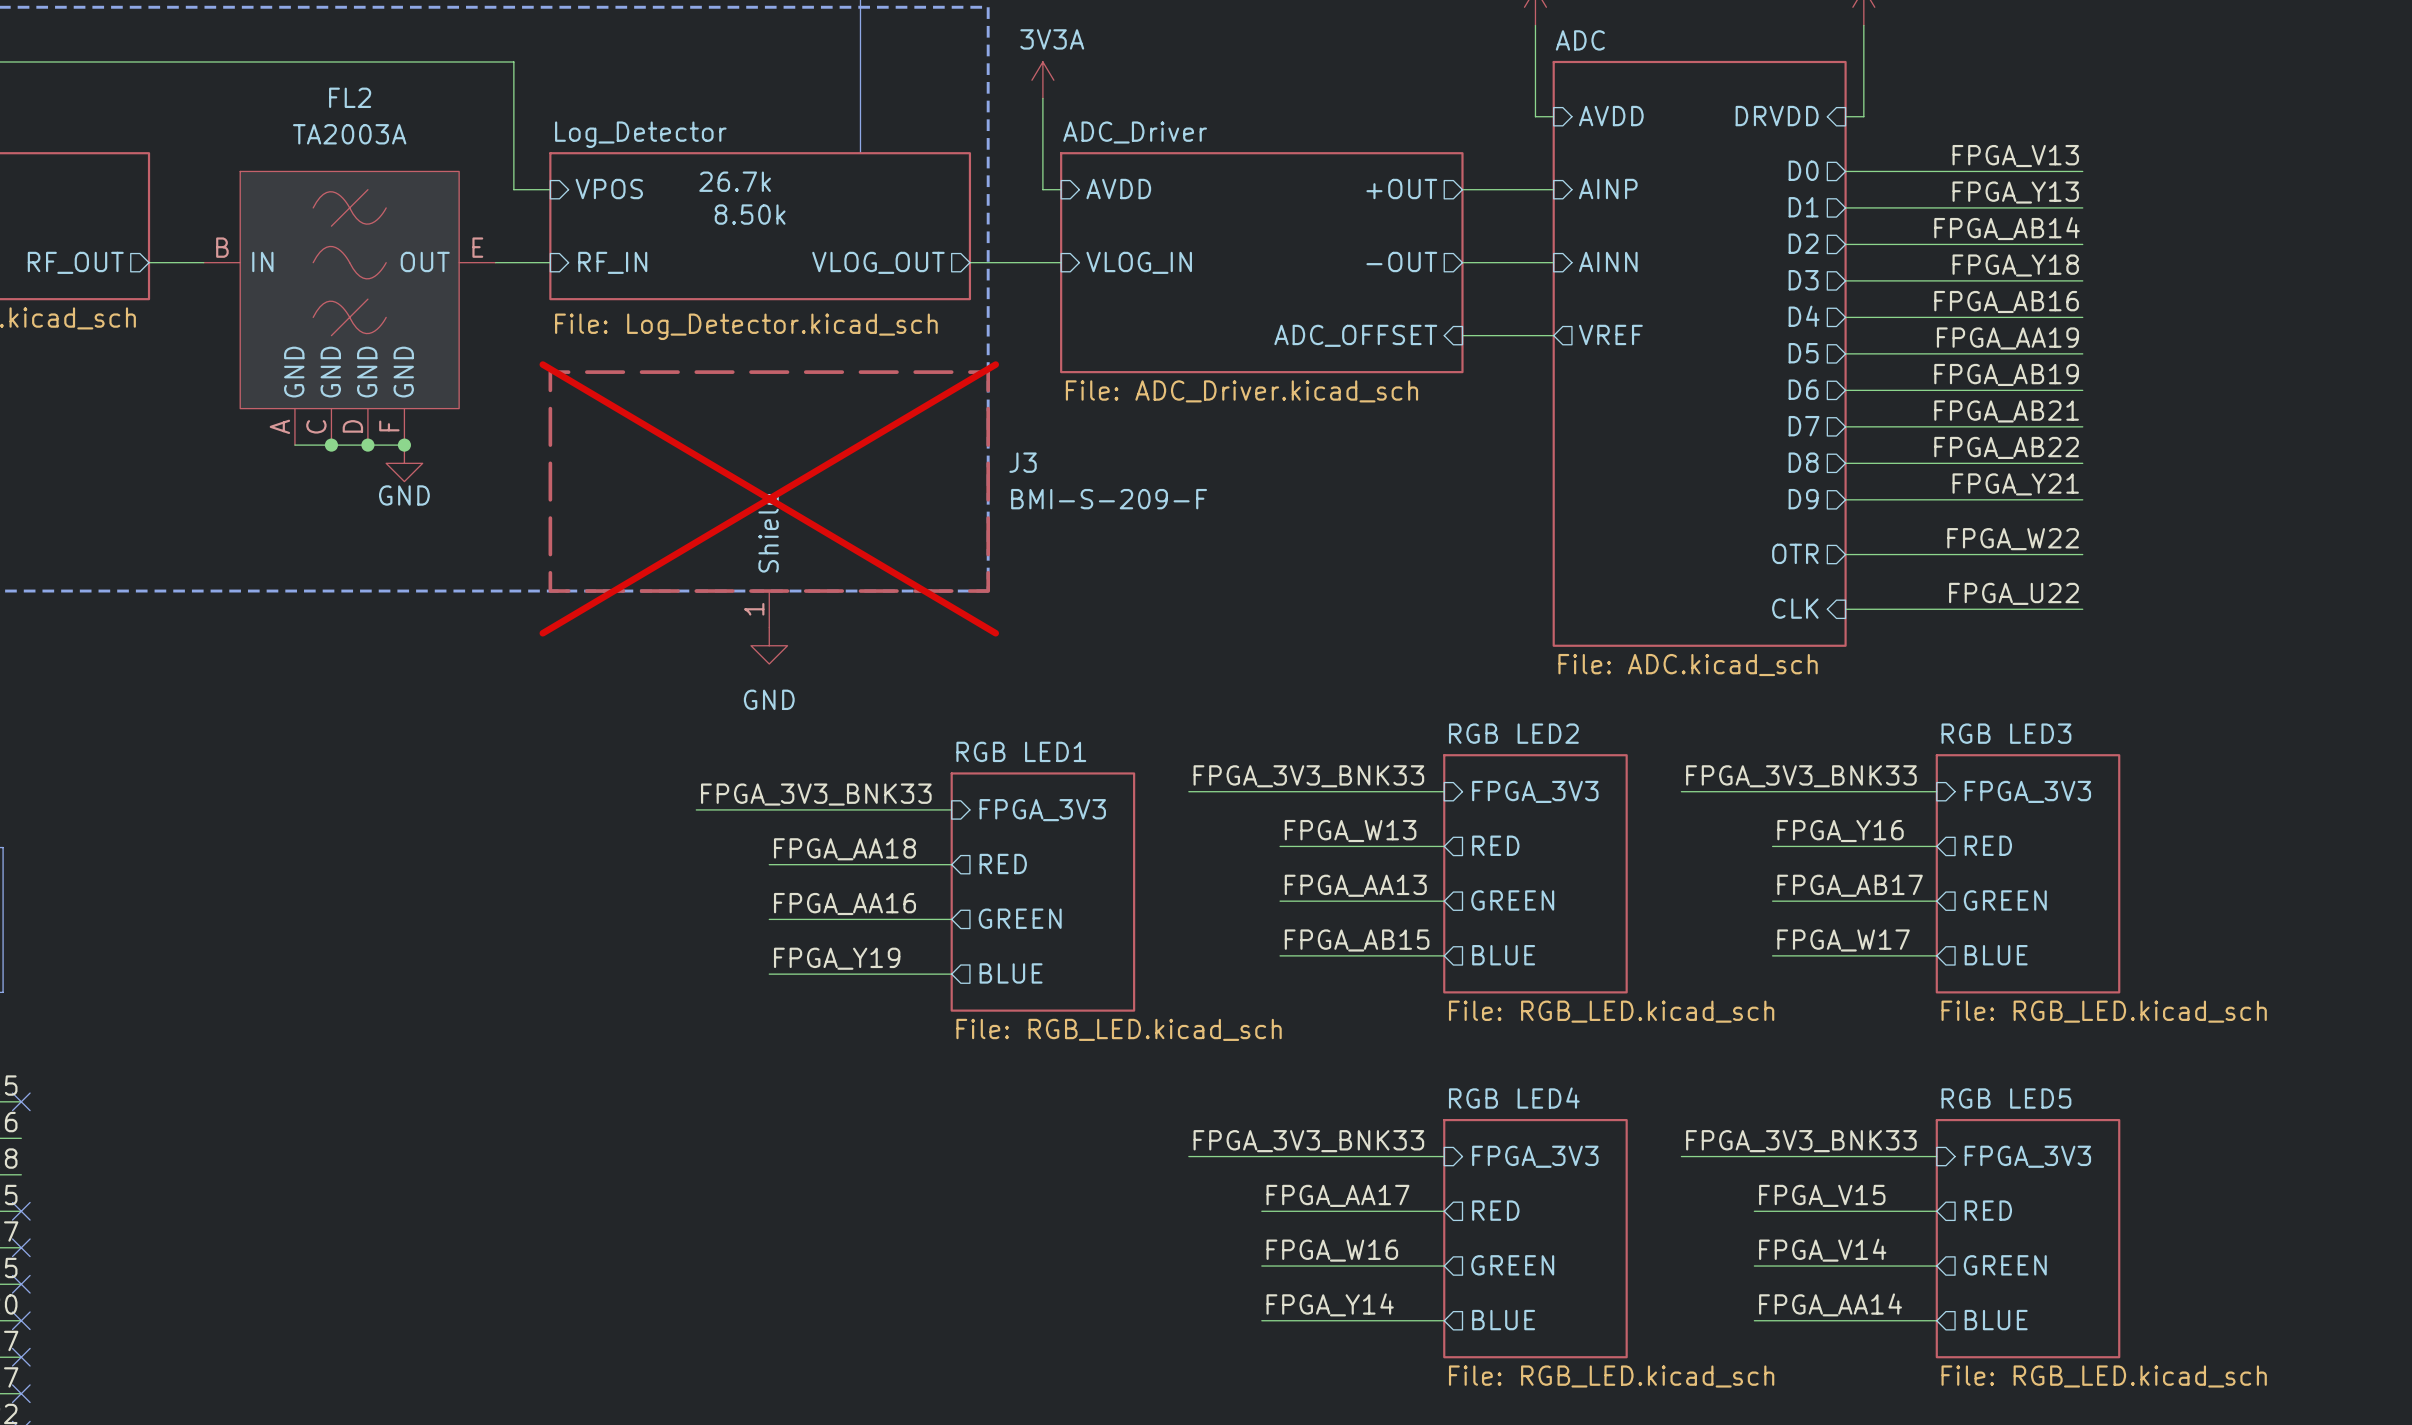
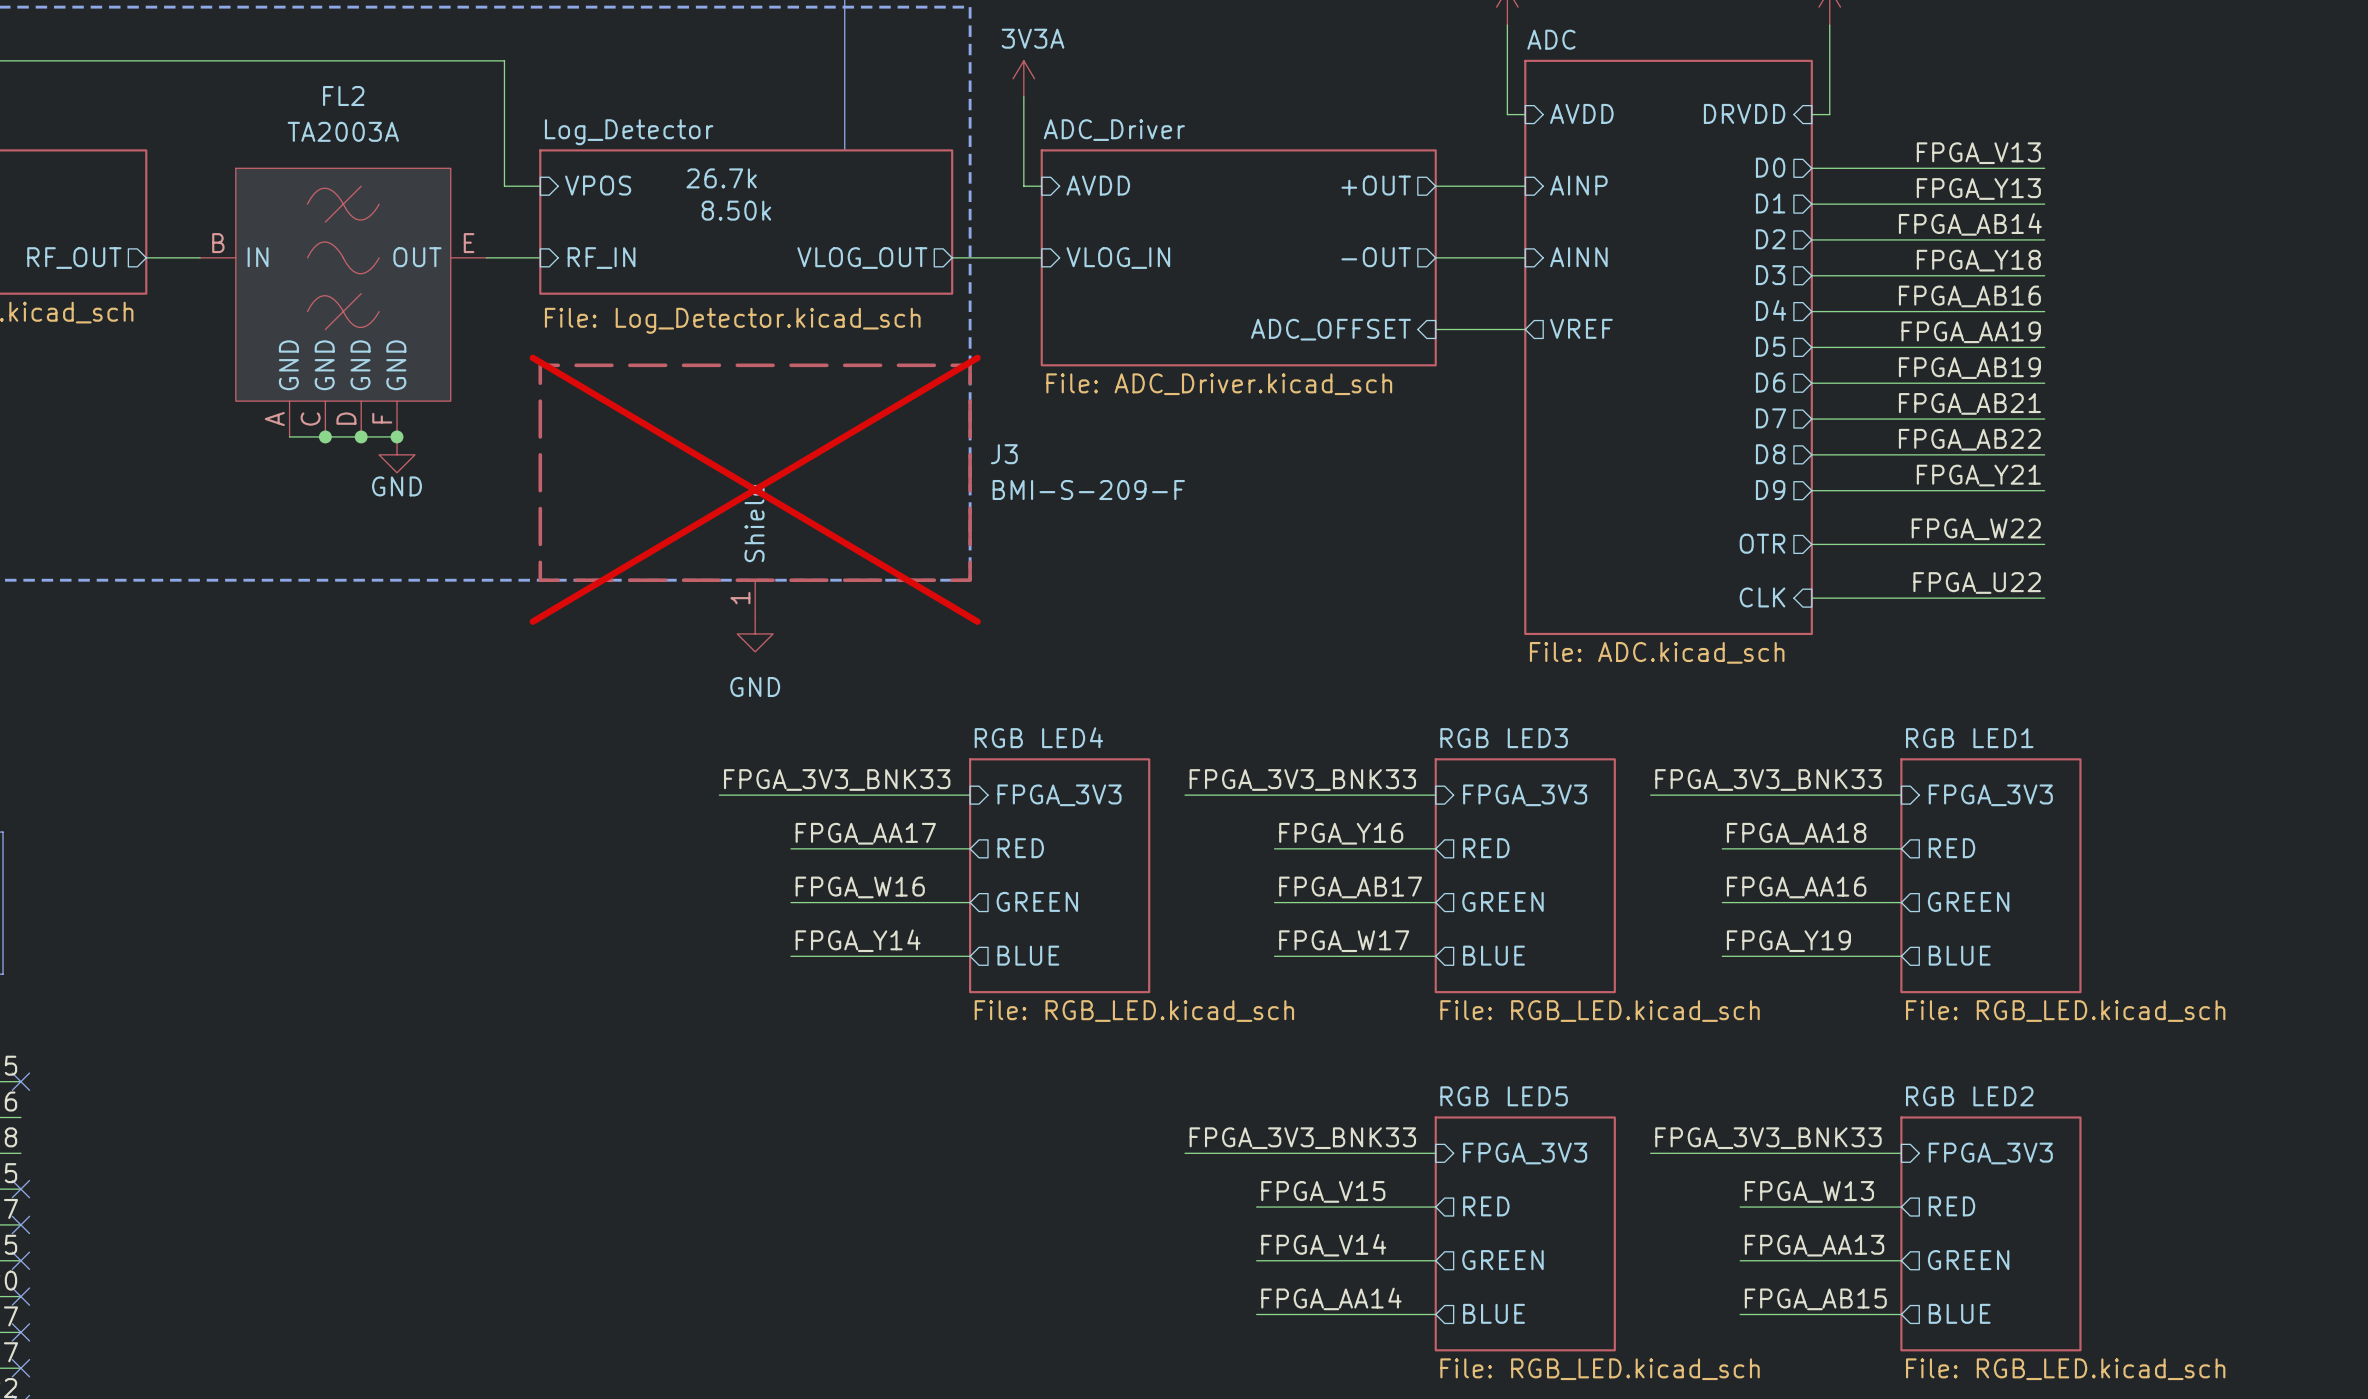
label position: FPGA_3V3_BNK33 (1308, 776) -> FPGA_3V3_BNK33 (1302, 780)
label position: FPGA_3V3_BNK33 (1801, 776) -> FPGA_3V3_BNK33 (1768, 780)
wire: (1188, 791) (1444, 791) -> (1185, 795) (1435, 795)
sheet pin position: FPGA_3V3 (1535, 791) -> FPGA_3V3 (1525, 795)
wire: (1681, 791) (1936, 791) -> none
sheet pin position: FPGA_3V3 (2027, 791) -> FPGA_3V3 (1990, 795)
label position: FPGA_3V3_BNK33 (816, 794) -> FPGA_3V3_BNK33 (837, 780)
wire: (696, 809) (732, 809) -> (934, 795) (970, 795)
sheet pin position: FPGA_3V3 (1042, 810) -> FPGA_3V3 (1059, 795)
label: FPGA_W13 (1350, 831) -> none
label: FPGA_Y16 (1840, 831) -> none
sheet pin position: RED (1495, 845) -> RED (1486, 848)
sheet pin position: RED (1988, 845) -> RED (1951, 848)
wire: (1280, 846) (1444, 846) -> (1274, 848) (1435, 848)
wire: (1772, 846) (1936, 846) -> none
label: FPGA_AA18 (844, 849) -> FPGA_AA17 (865, 833)
label: none -> FPGA_Y16 (1341, 833)
label: none -> FPGA_AA18 (1796, 833)
sheet pin position: RED (1003, 863) -> RED (1020, 848)
wire: (769, 864) (805, 864) -> (934, 848) (970, 848)
sheet RGB LED2 position: (1535, 873) -> (1990, 1233)
sheet RGB LED3 position: (2028, 873) -> (1525, 875)
label: FPGA_AA13 (1355, 885) -> none
label: FPGA_AB17 (1850, 885) -> none
sheet RGB LED1 position: (1042, 892) -> (1990, 875)
sheet pin position: GREEN (1512, 900) -> GREEN (1502, 901)
sheet pin position: GREEN (2005, 900) -> GREEN (1968, 901)
wire: (1280, 901) (1444, 901) -> (1274, 902) (1435, 902)
wire: (1772, 901) (1936, 901) -> (1740, 1207) (1901, 1207)
label: FPGA_AA16 (844, 903) -> FPGA_W16 (860, 887)
label: none -> FPGA_AB17 (1350, 887)
label: none -> FPGA_AA16 (1796, 887)
sheet pin position: GREEN (1020, 918) -> GREEN (1037, 901)
wire: (769, 919) (805, 919) -> (934, 902) (970, 902)
label: FPGA_AB15 (1357, 940) -> none
label: FPGA_W17 (1843, 940) -> none
wire: (1280, 955) (1444, 955) -> (1274, 956) (1435, 956)
sheet pin position: BLUE (1503, 955) -> BLUE (1494, 955)
wire: (1772, 955) (1936, 955) -> (1740, 1260) (1901, 1260)
sheet pin position: BLUE (1996, 955) -> BLUE (1959, 955)
label: FPGA_Y19 (837, 958) -> FPGA_Y14 (858, 940)
label: none -> FPGA_W17 (1344, 941)
label: none -> FPGA_Y19 (1788, 941)
sheet pin position: BLUE (1011, 973) -> BLUE (1028, 955)
wire: (769, 974) (805, 974) -> (934, 956) (970, 956)
label position: FPGA_3V3_BNK33 (1308, 1141) -> FPGA_3V3_BNK33 (1302, 1138)
label position: FPGA_3V3_BNK33 (1801, 1141) -> FPGA_3V3_BNK33 (1768, 1138)
wire: (1188, 1156) (1444, 1156) -> (1185, 1153) (1435, 1153)
sheet pin position: FPGA_3V3 (1535, 1156) -> FPGA_3V3 (1525, 1153)
wire: (1681, 1156) (1936, 1156) -> (1650, 795) (1901, 795)
sheet pin position: FPGA_3V3 (2027, 1156) -> FPGA_3V3 (1990, 1153)
wire: none -> (1650, 1153) (1901, 1153)
label: FPGA_AA17 (1337, 1195) -> none
label: FPGA_V15 (1822, 1195) -> none
sheet pin position: RED (1495, 1210) -> RED (1486, 1206)
sheet pin position: RED (1988, 1210) -> RED (1951, 1206)
wire: (1261, 1211) (1444, 1211) -> (1256, 1207) (1435, 1207)
wire: (1754, 1211) (1936, 1211) -> (1722, 848) (1901, 848)
label: none -> FPGA_V15 (1323, 1191)
label: none -> FPGA_W13 (1809, 1191)
sheet RGB LED4 position: (1535, 1238) -> (1059, 875)
sheet RGB LED5 position: (2028, 1238) -> (1525, 1233)
label: FPGA_W16 (1332, 1250) -> none
label: FPGA_V14 (1822, 1250) -> none
sheet pin position: GREEN (1512, 1265) -> GREEN (1502, 1260)
sheet pin position: GREEN (2005, 1265) -> GREEN (1968, 1260)
wire: (1261, 1266) (1444, 1266) -> (1256, 1260) (1435, 1260)
wire: (1754, 1266) (1936, 1266) -> (1722, 902) (1901, 902)
label: none -> FPGA_V14 (1323, 1245)
label: none -> FPGA_AA13 (1814, 1245)
label: FPGA_Y14 (1330, 1304) -> none
label: FPGA_AA14 (1830, 1304) -> none
wire: (1261, 1320) (1444, 1320) -> (1256, 1314) (1435, 1314)
sheet pin position: BLUE (1503, 1320) -> BLUE (1494, 1313)
wire: (1754, 1320) (1936, 1320) -> (1722, 956) (1901, 956)
sheet pin position: BLUE (1996, 1320) -> BLUE (1959, 1313)
label: none -> FPGA_AA14 (1331, 1298)
label: none -> FPGA_AB15 (1815, 1299)
wire: none -> (1740, 1314) (1901, 1314)

